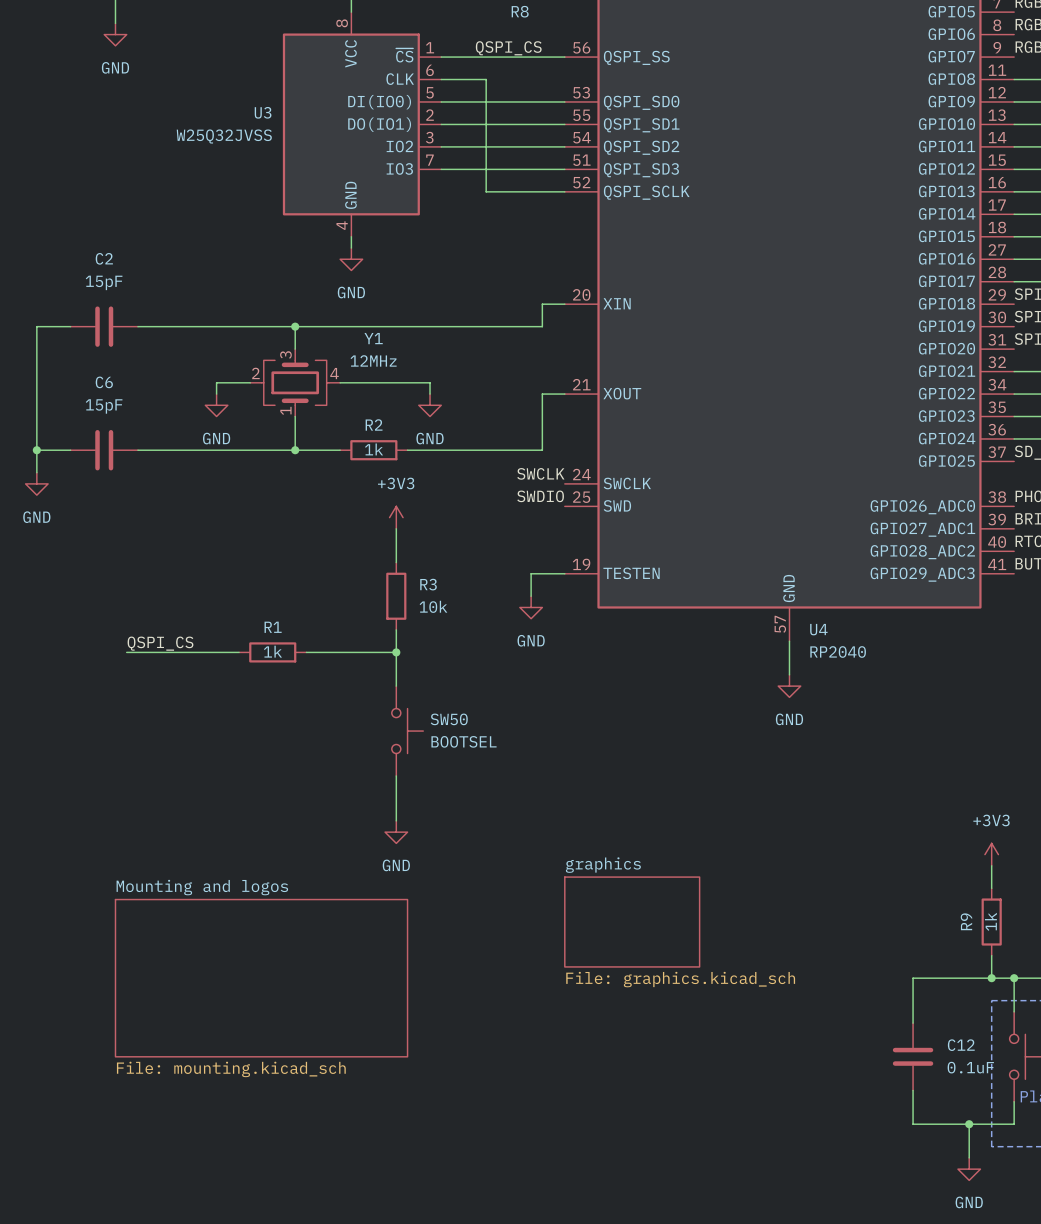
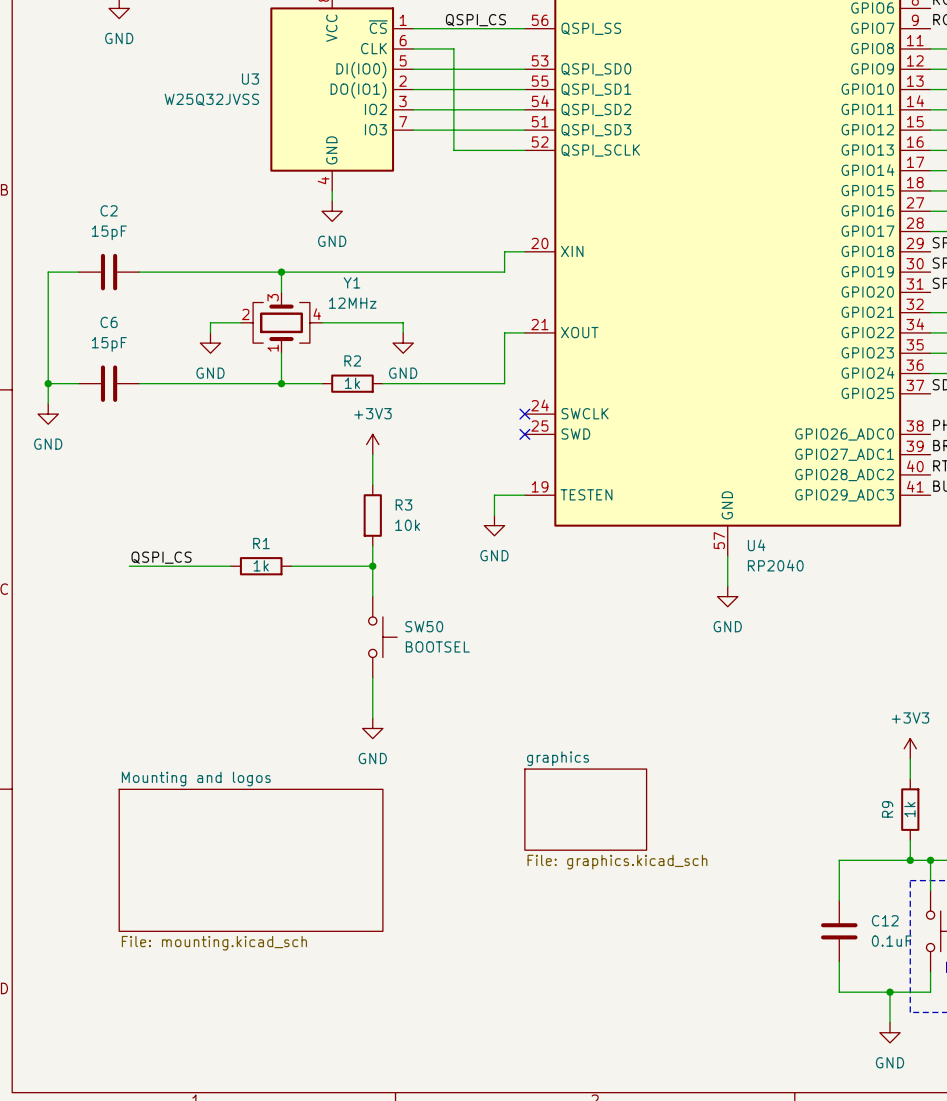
label: SWCLK (540, 473) -> none
no-connect mark: none -> (524, 414)
label: SWDIO (540, 496) -> none
no-connect mark: none -> (524, 434)

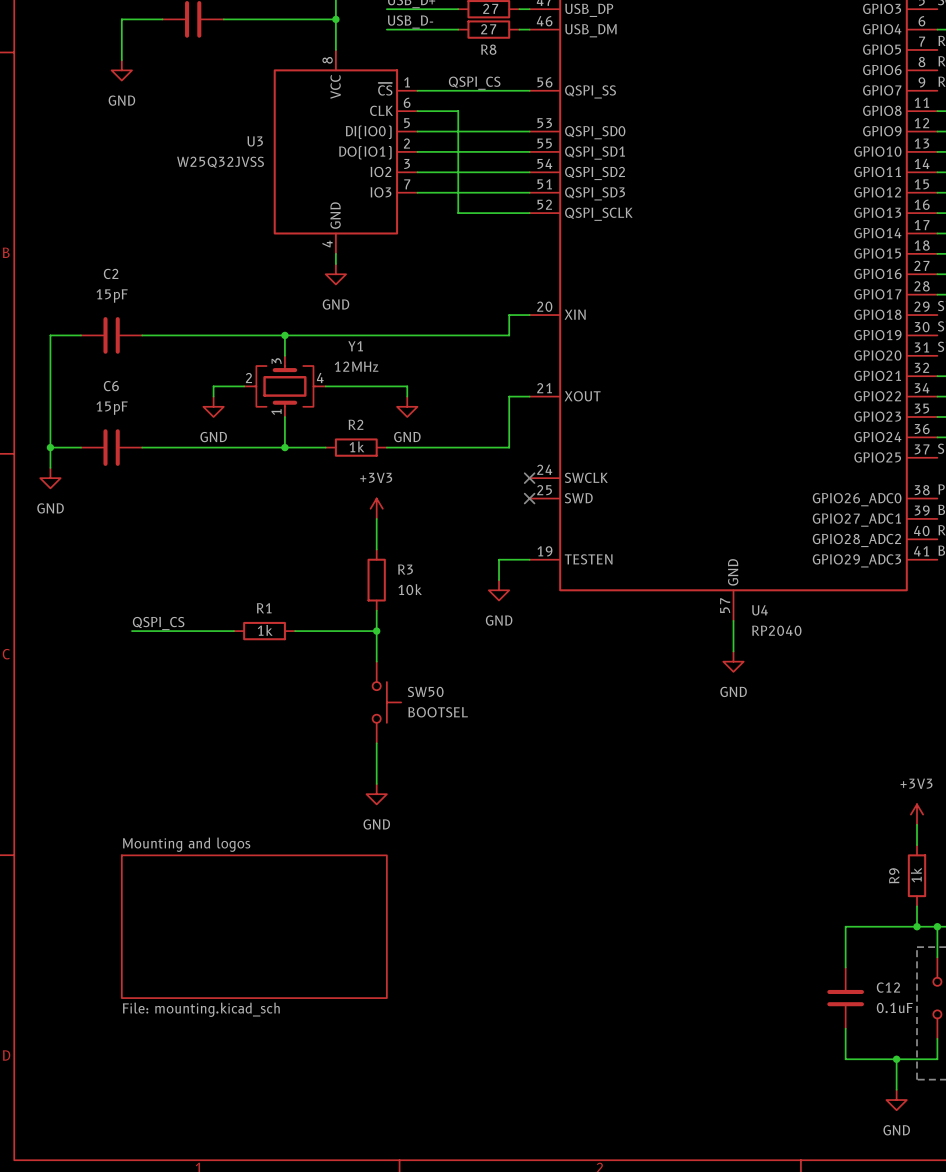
sheet graphics: File: graphics.kicad_sch (585, 809) -> none

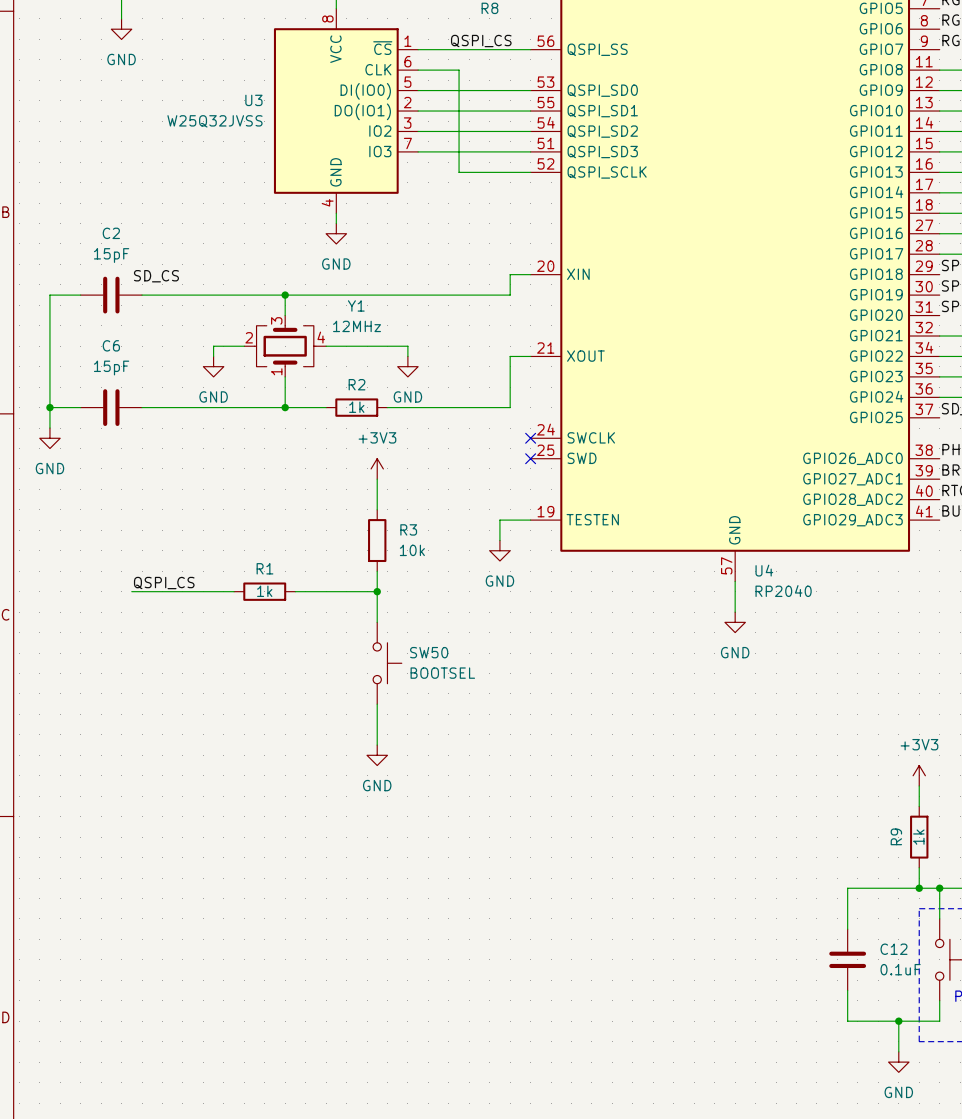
label: none -> SD_CS (156, 276)
sheet Mounting and logos: File: mounting.kicad_sch (254, 926) -> none

